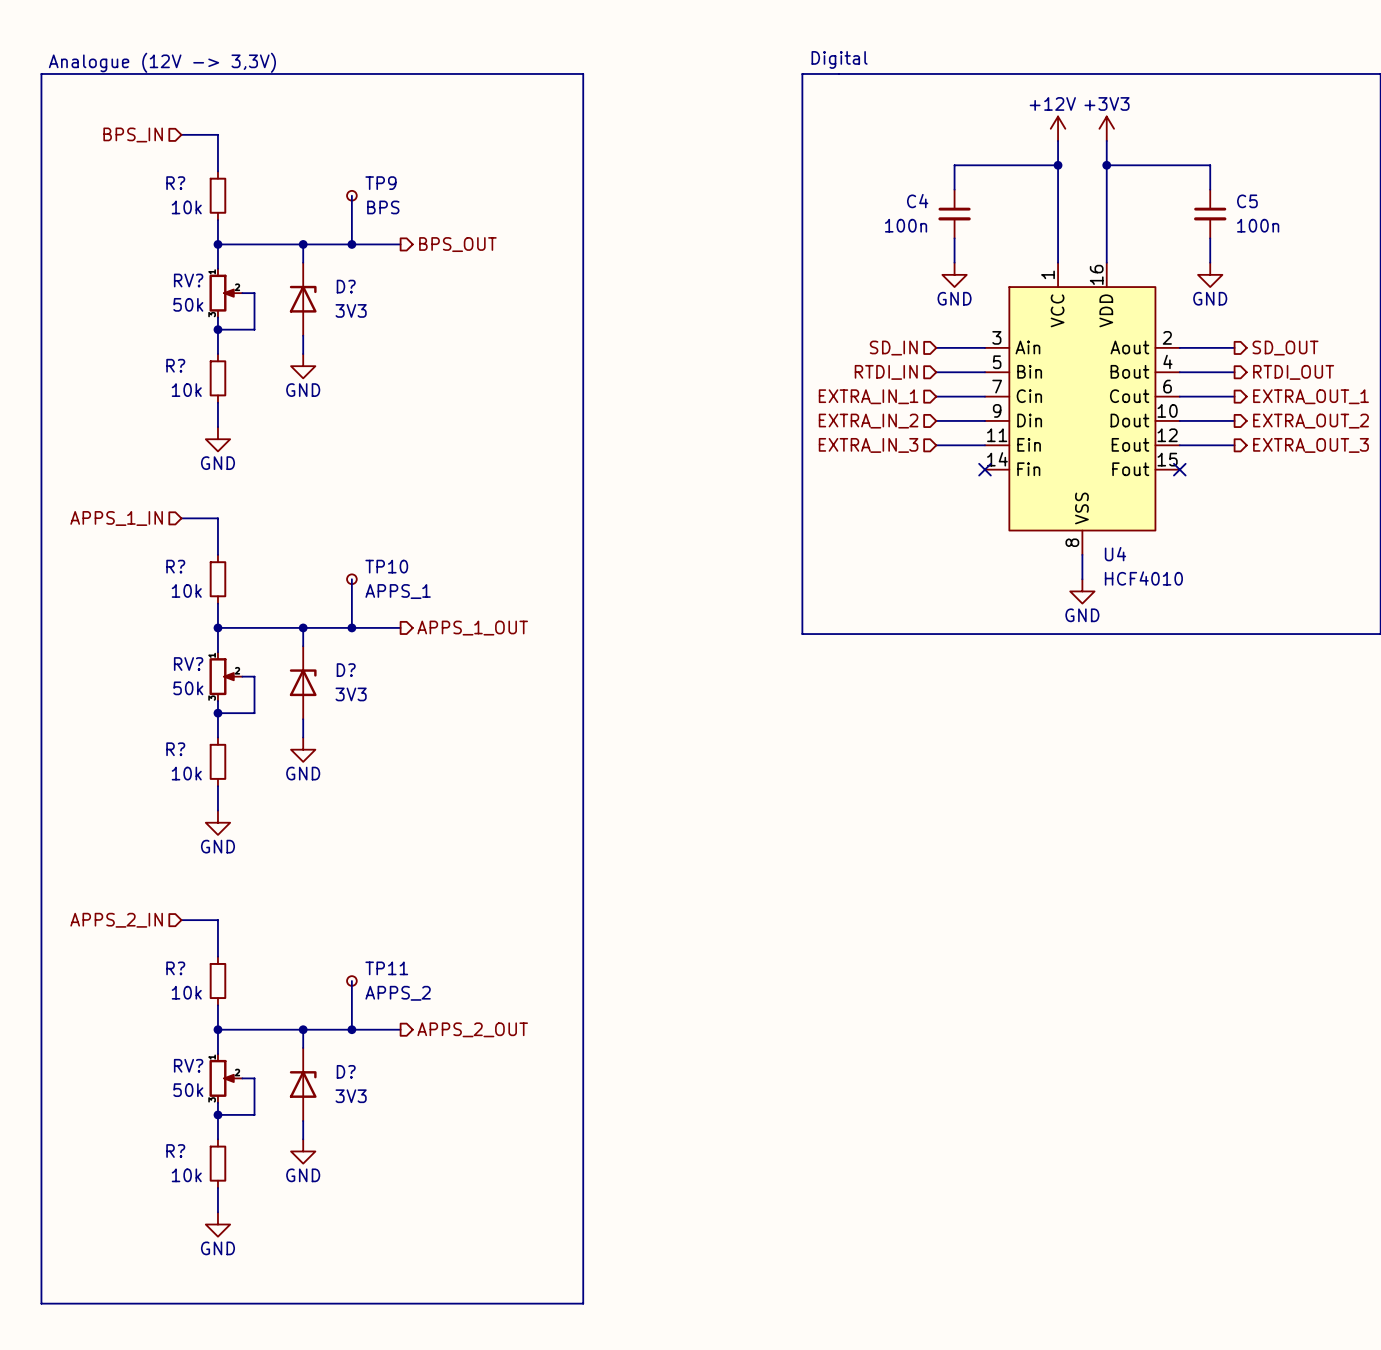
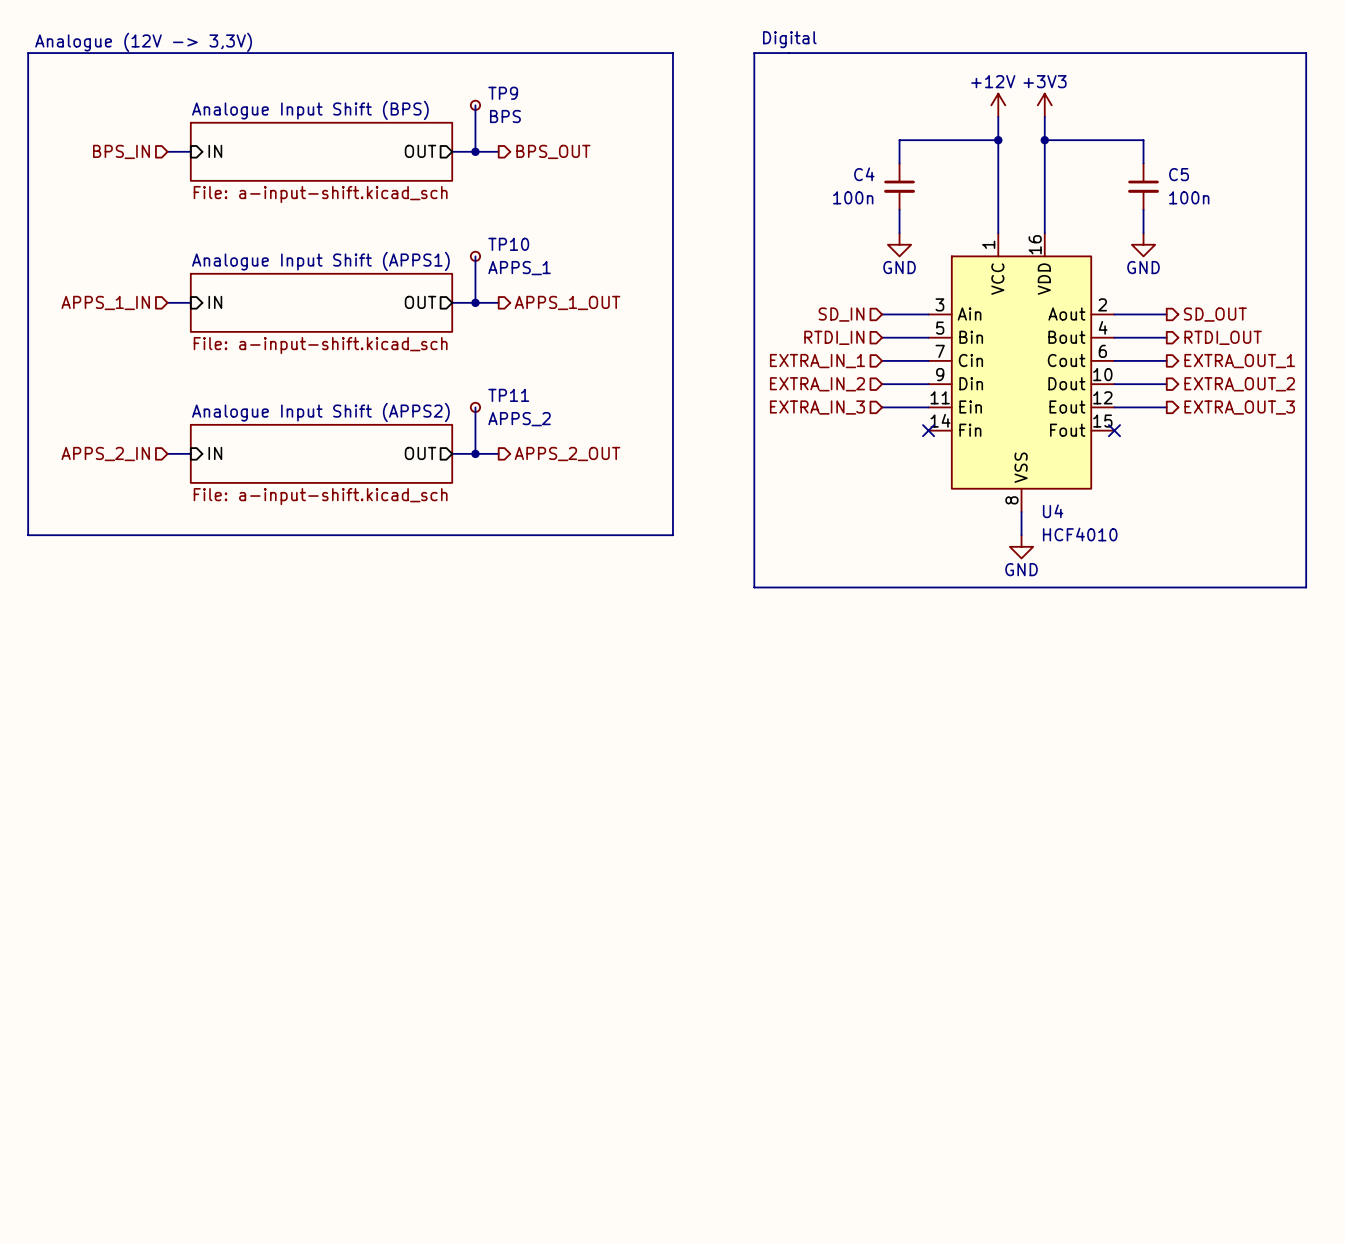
line: (583, 73) (583, 1303) (41, 1303) (41, 579) -> (545, 53) (672, 53) (672, 535) (28, 535)
hierarchical label position: BPS_IN (133, 134) -> BPS_IN (121, 151)
wire: (181, 134) (217, 134) (217, 171) -> none
wire: none -> (167, 151) (190, 151)
sheet pin: none -> IN (215, 151)
sheet Analogue Input Shift (BPS): none -> File: a-input-shift.kicad_sch (321, 151)
sheet pin: none -> OUT (420, 151)
wire: none -> (452, 151) (498, 151)
junction: none -> (475, 151)
R?: 10k (217, 195) -> none
wire: (351, 195) (351, 244) -> (475, 105) (475, 151)
TP9 position: (351, 195) -> (475, 105)
wire: (217, 220) (217, 268) -> none
wire: (217, 244) (400, 244) -> none
junction: (217, 244) -> none
wire: (303, 244) (303, 262) -> none
junction: (303, 244) -> none
junction: (351, 244) -> none
hierarchical label position: BPS_OUT (457, 244) -> BPS_OUT (553, 151)
wire: none -> (475, 256) (475, 302)
RV?: 50k (225, 293) -> none
wire: (242, 293) (254, 293) (254, 329) (217, 329) -> none
D?: 3V3 (303, 299) -> none
wire: (217, 317) (217, 354) -> none
junction: (217, 329) -> none
wire: none -> (167, 302) (190, 302)
sheet pin: none -> IN (215, 302)
wire: (303, 335) (303, 354) -> none
sheet Analogue Input Shift (APPS1): none -> File: a-input-shift.kicad_sch (321, 302)
sheet pin: none -> OUT (420, 302)
wire: none -> (452, 302) (498, 302)
junction: none -> (475, 302)
hierarchical label: none -> APPS_1_OUT (567, 302)
power symbol: GND (303, 366) -> none
R?: 10k (217, 378) -> none
wire: (217, 402) (217, 427) -> none
power symbol: GND (217, 439) -> none
sheet pin: none -> IN (215, 453)
sheet pin: none -> OUT (420, 453)
hierarchical label: none -> APPS_2_IN (105, 454)
wire: none -> (167, 453) (190, 453)
sheet Analogue Input Shift (APPS2): none -> File: a-input-shift.kicad_sch (321, 453)
wire: none -> (452, 453) (498, 453)
junction: none -> (475, 453)
hierarchical label: none -> APPS_2_OUT (567, 454)
hierarchical label position: APPS_1_IN (116, 518) -> APPS_1_IN (105, 302)
wire: (181, 518) (217, 518) (217, 554) -> none
R?: 10k (217, 579) -> none
wire: (351, 579) (351, 627) -> (475, 407) (475, 453)
TP10 position: (351, 579) -> (475, 256)
wire: (217, 603) (217, 652) -> none
wire: (217, 627) (400, 627) -> none
junction: (217, 627) -> none
wire: (303, 627) (303, 646) -> none
junction: (303, 627) -> none
junction: (351, 627) -> none
hierarchical label: APPS_1_OUT (472, 628) -> none
RV?: 50k (225, 676) -> none
wire: (242, 676) (254, 676) (254, 713) (217, 713) -> none
D?: 3V3 (303, 682) -> none
wire: (217, 700) (217, 737) -> none
junction: (217, 713) -> none
wire: (303, 719) (303, 737) -> none
power symbol: GND (303, 749) -> none
R?: 10k (217, 761) -> none
wire: (217, 786) (217, 810) -> none
power symbol: GND (217, 822) -> none
hierarchical label: APPS_2_IN (116, 920) -> none
wire: (181, 920) (217, 920) (217, 956) -> none
R?: 10k (217, 981) -> none
wire: (351, 981) (351, 1029) -> none
TP11 position: (351, 981) -> (475, 407)
wire: (217, 1005) (217, 1054) -> none
wire: (217, 1029) (400, 1029) -> none
junction: (217, 1029) -> none
wire: (303, 1029) (303, 1047) -> none
junction: (303, 1029) -> none
junction: (351, 1029) -> none
hierarchical label: APPS_2_OUT (472, 1029) -> none
RV?: 50k (225, 1078) -> none
wire: (242, 1078) (254, 1078) (254, 1114) (217, 1114) -> none
D?: 3V3 (303, 1084) -> none
wire: (217, 1102) (217, 1139) -> none
junction: (217, 1114) -> none
wire: (303, 1121) (303, 1139) -> none
power symbol: GND (303, 1151) -> none
R?: 10k (217, 1163) -> none
wire: (217, 1187) (217, 1212) -> none
power symbol: GND (217, 1224) -> none

